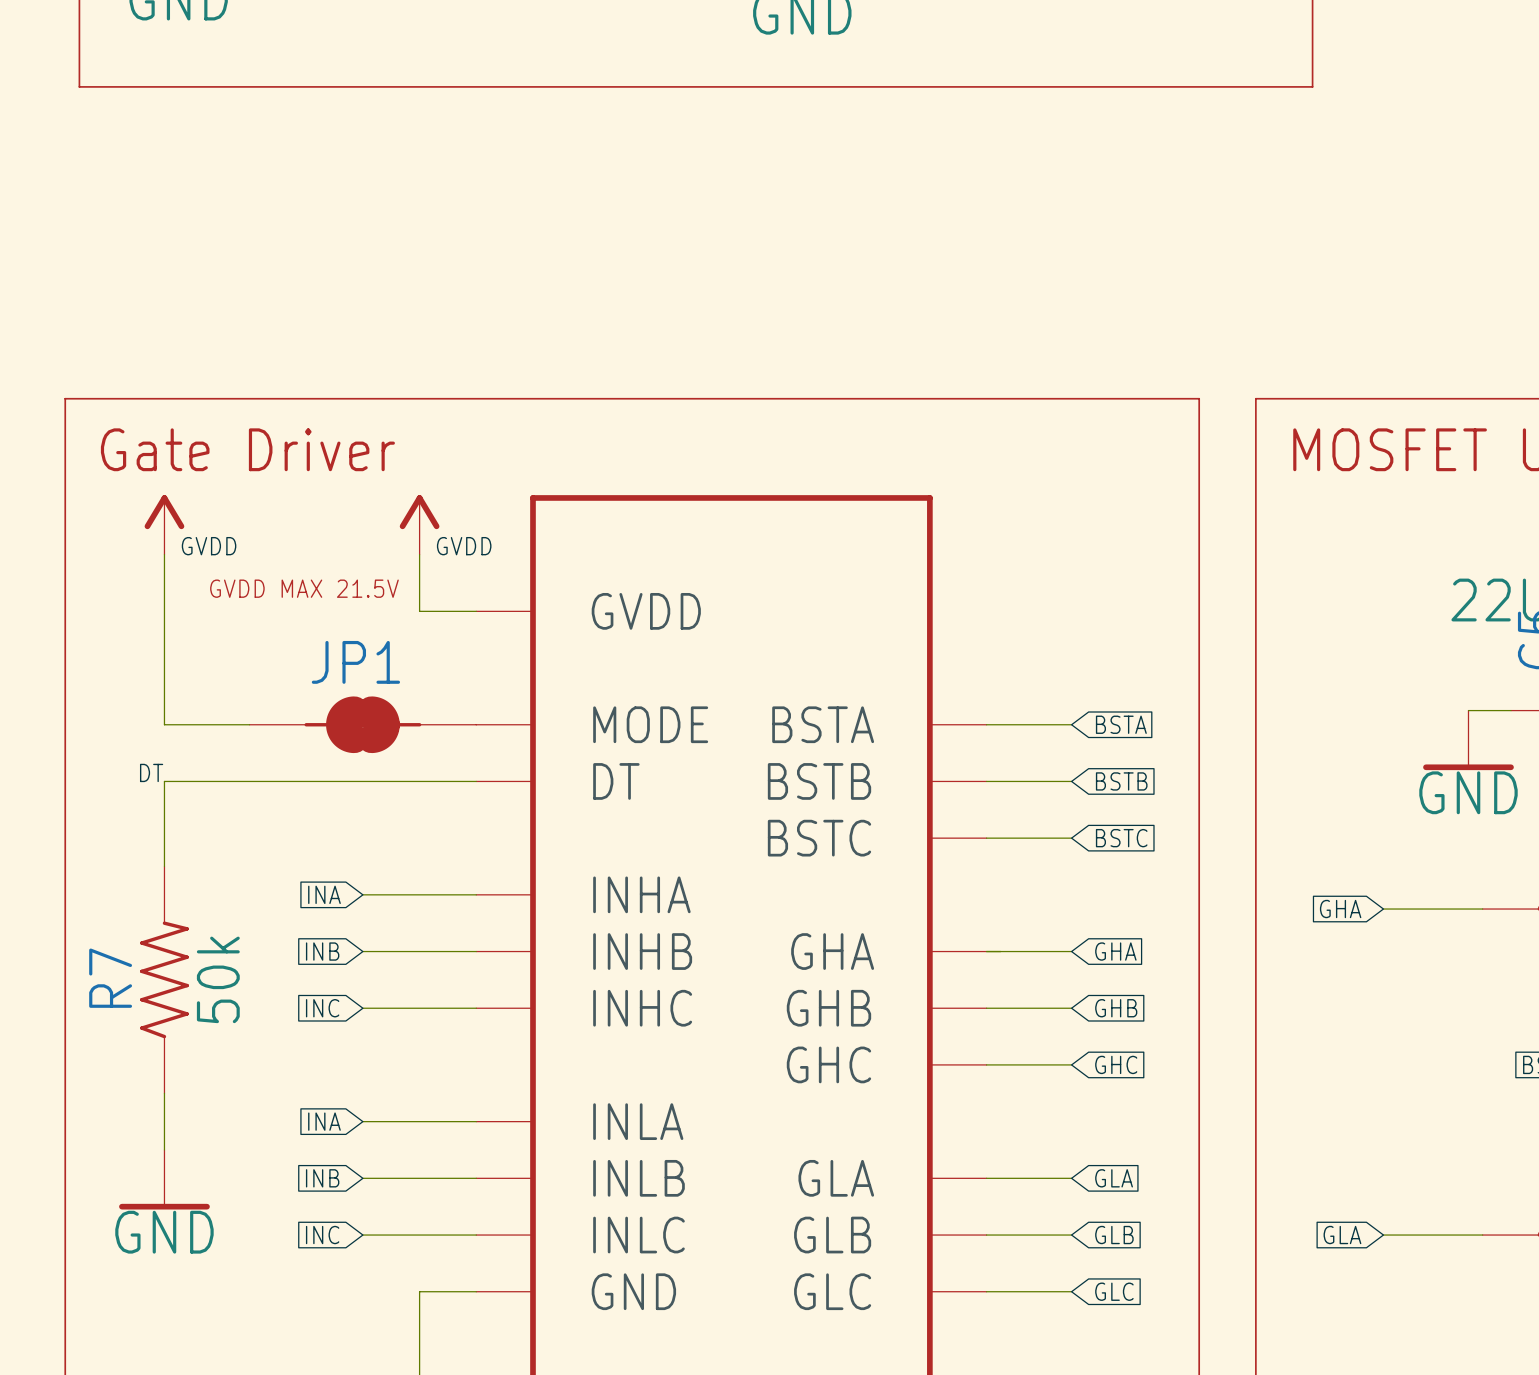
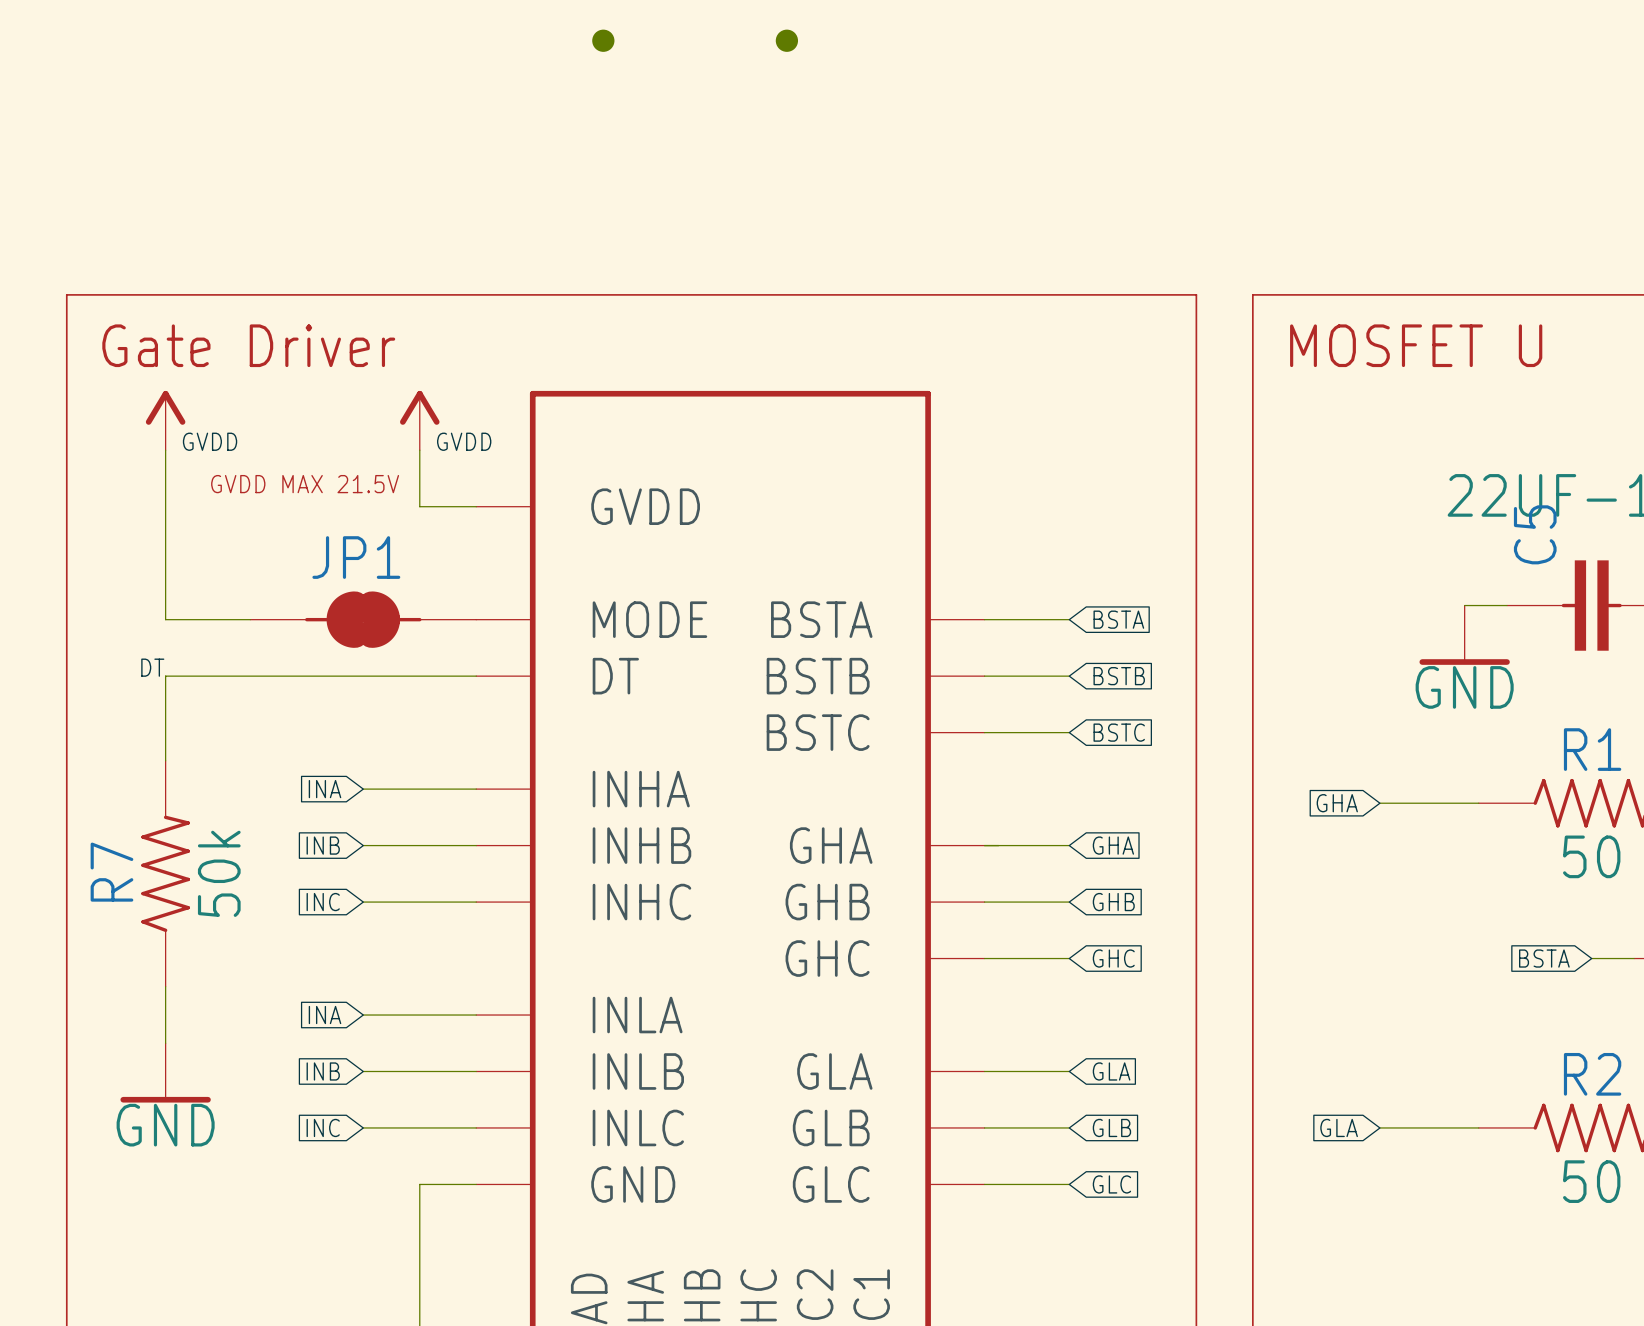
junction: none -> (603, 40)
junction: none -> (786, 40)

